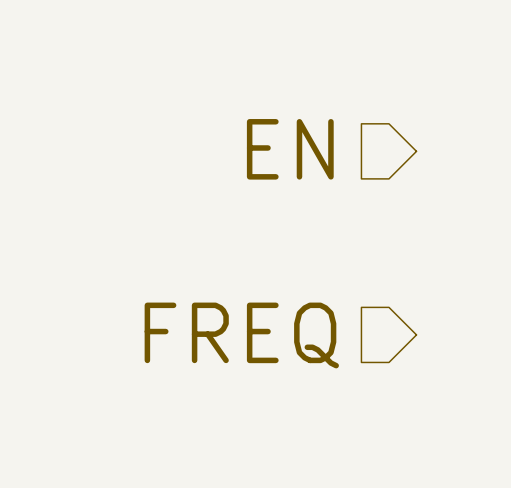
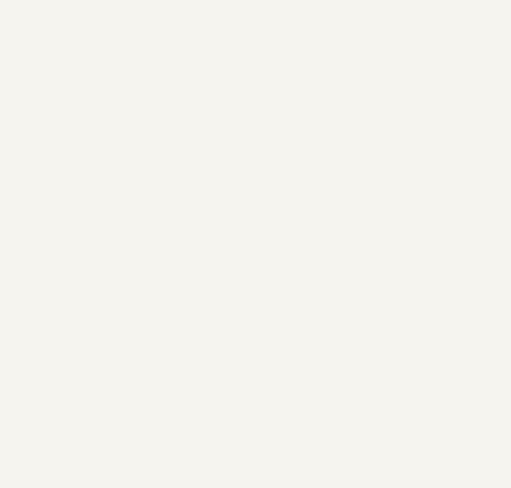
hierarchical label: EN (290, 149) -> none
hierarchical label: FREQ (241, 335) -> none

